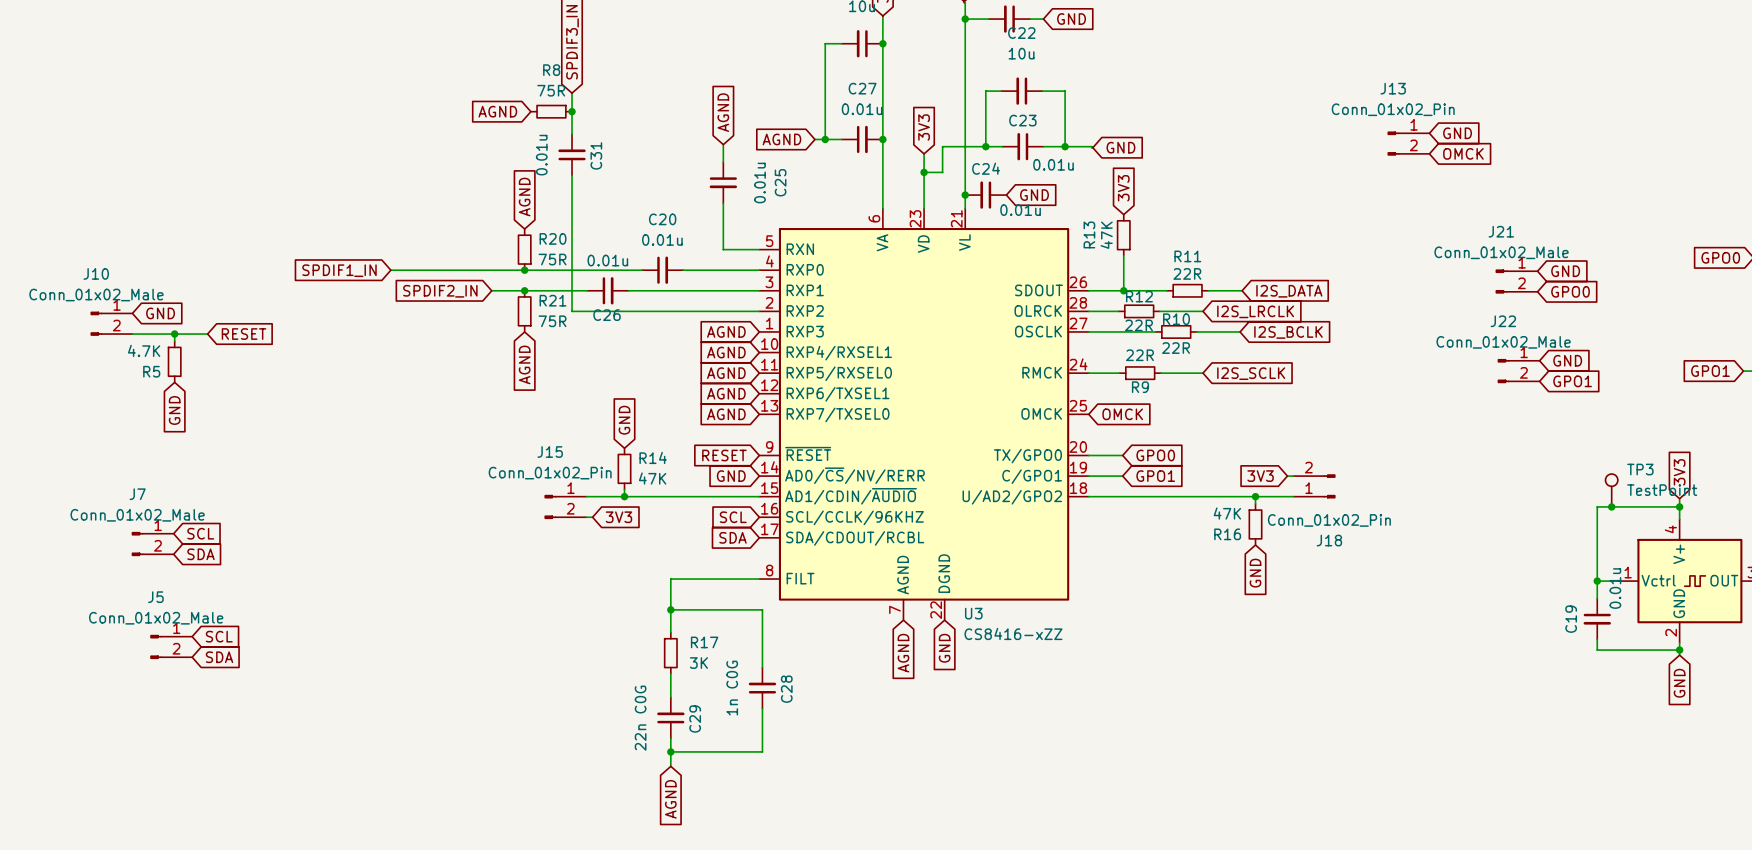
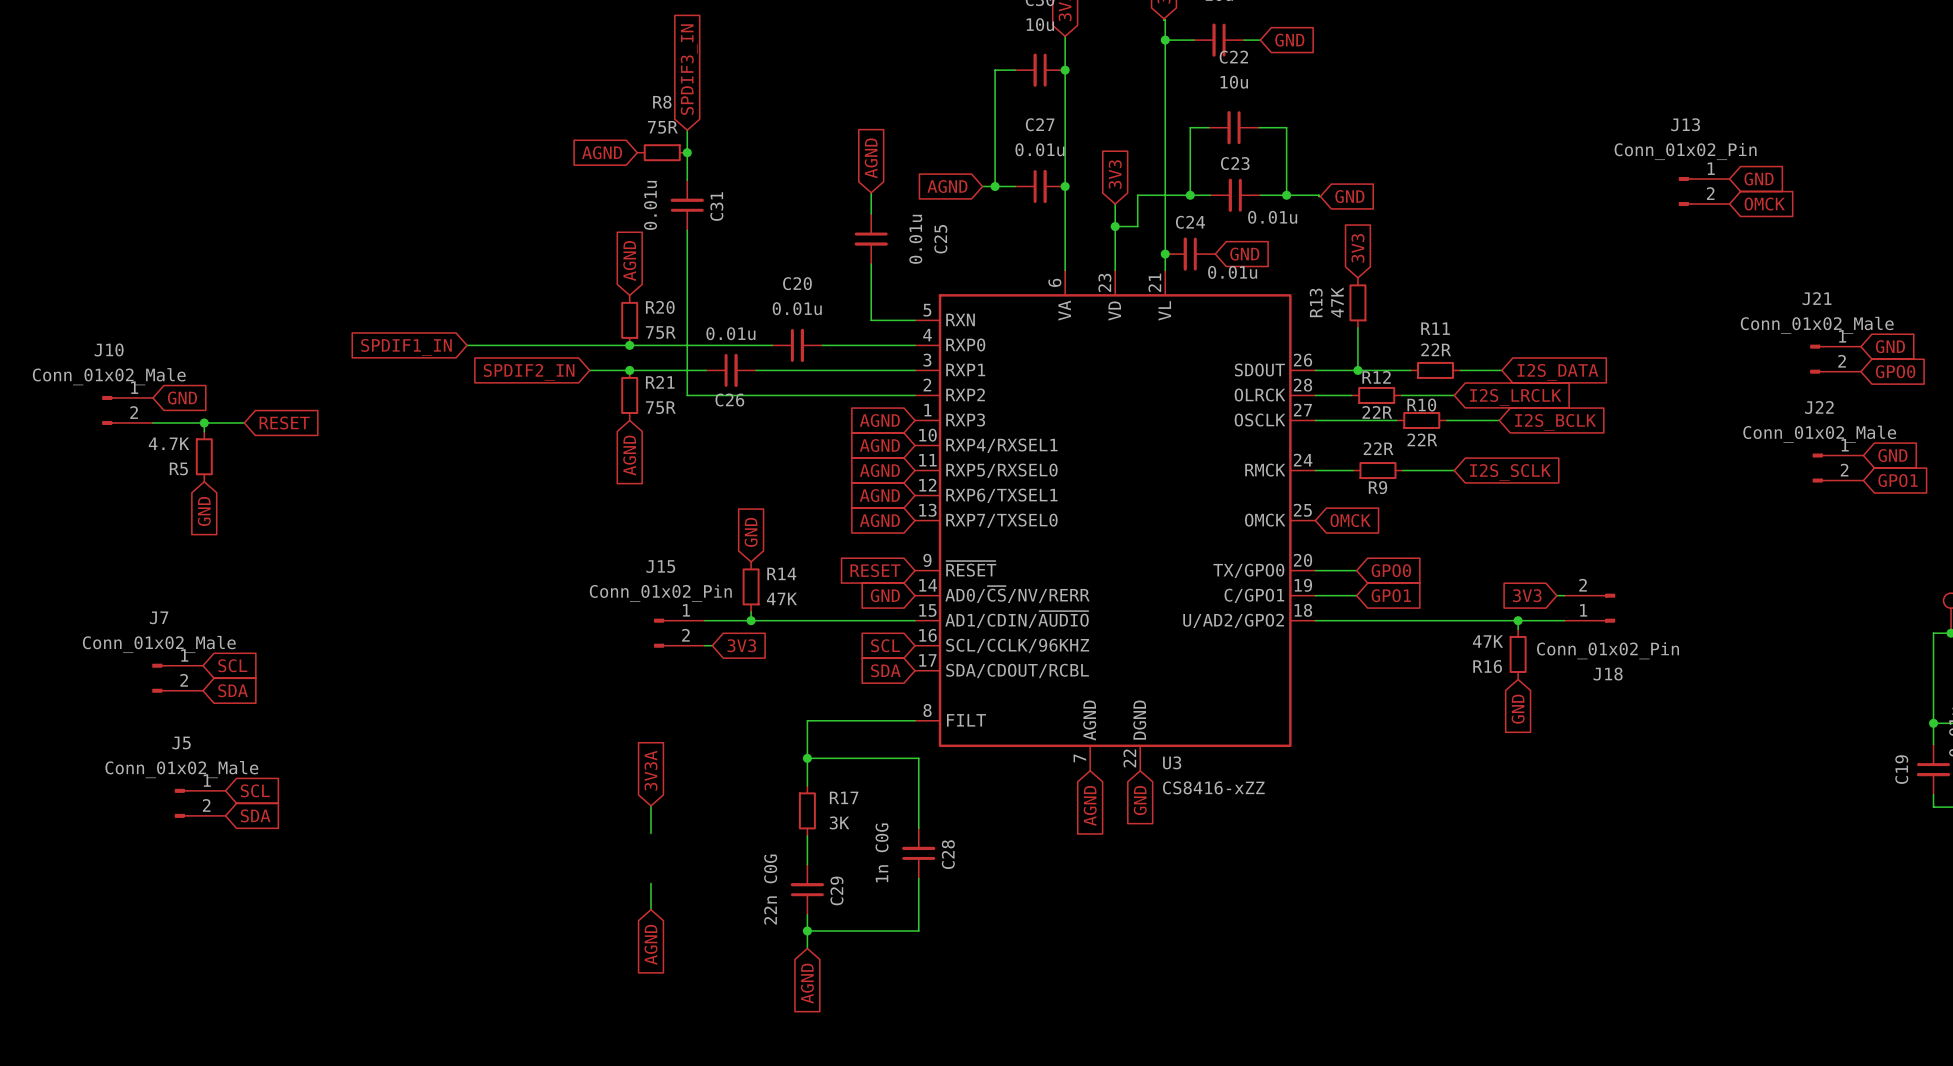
global label: none -> 3V3A (651, 770)
wire: none -> (650, 805) (650, 833)
wire: none -> (650, 883) (650, 909)
global label: none -> AGND (651, 944)

